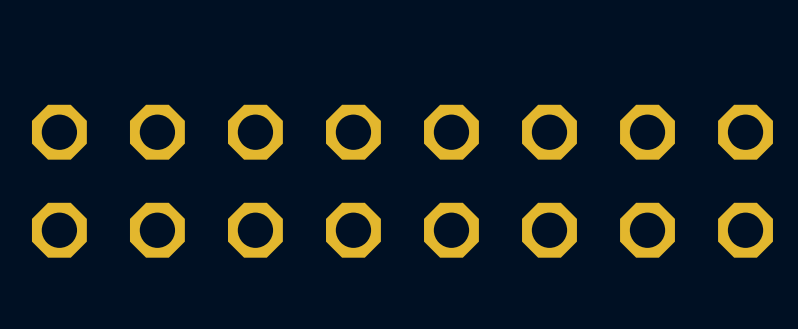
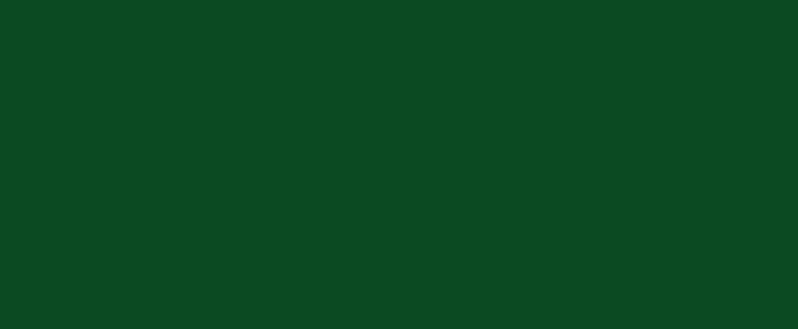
part: (402, 181) -> none

